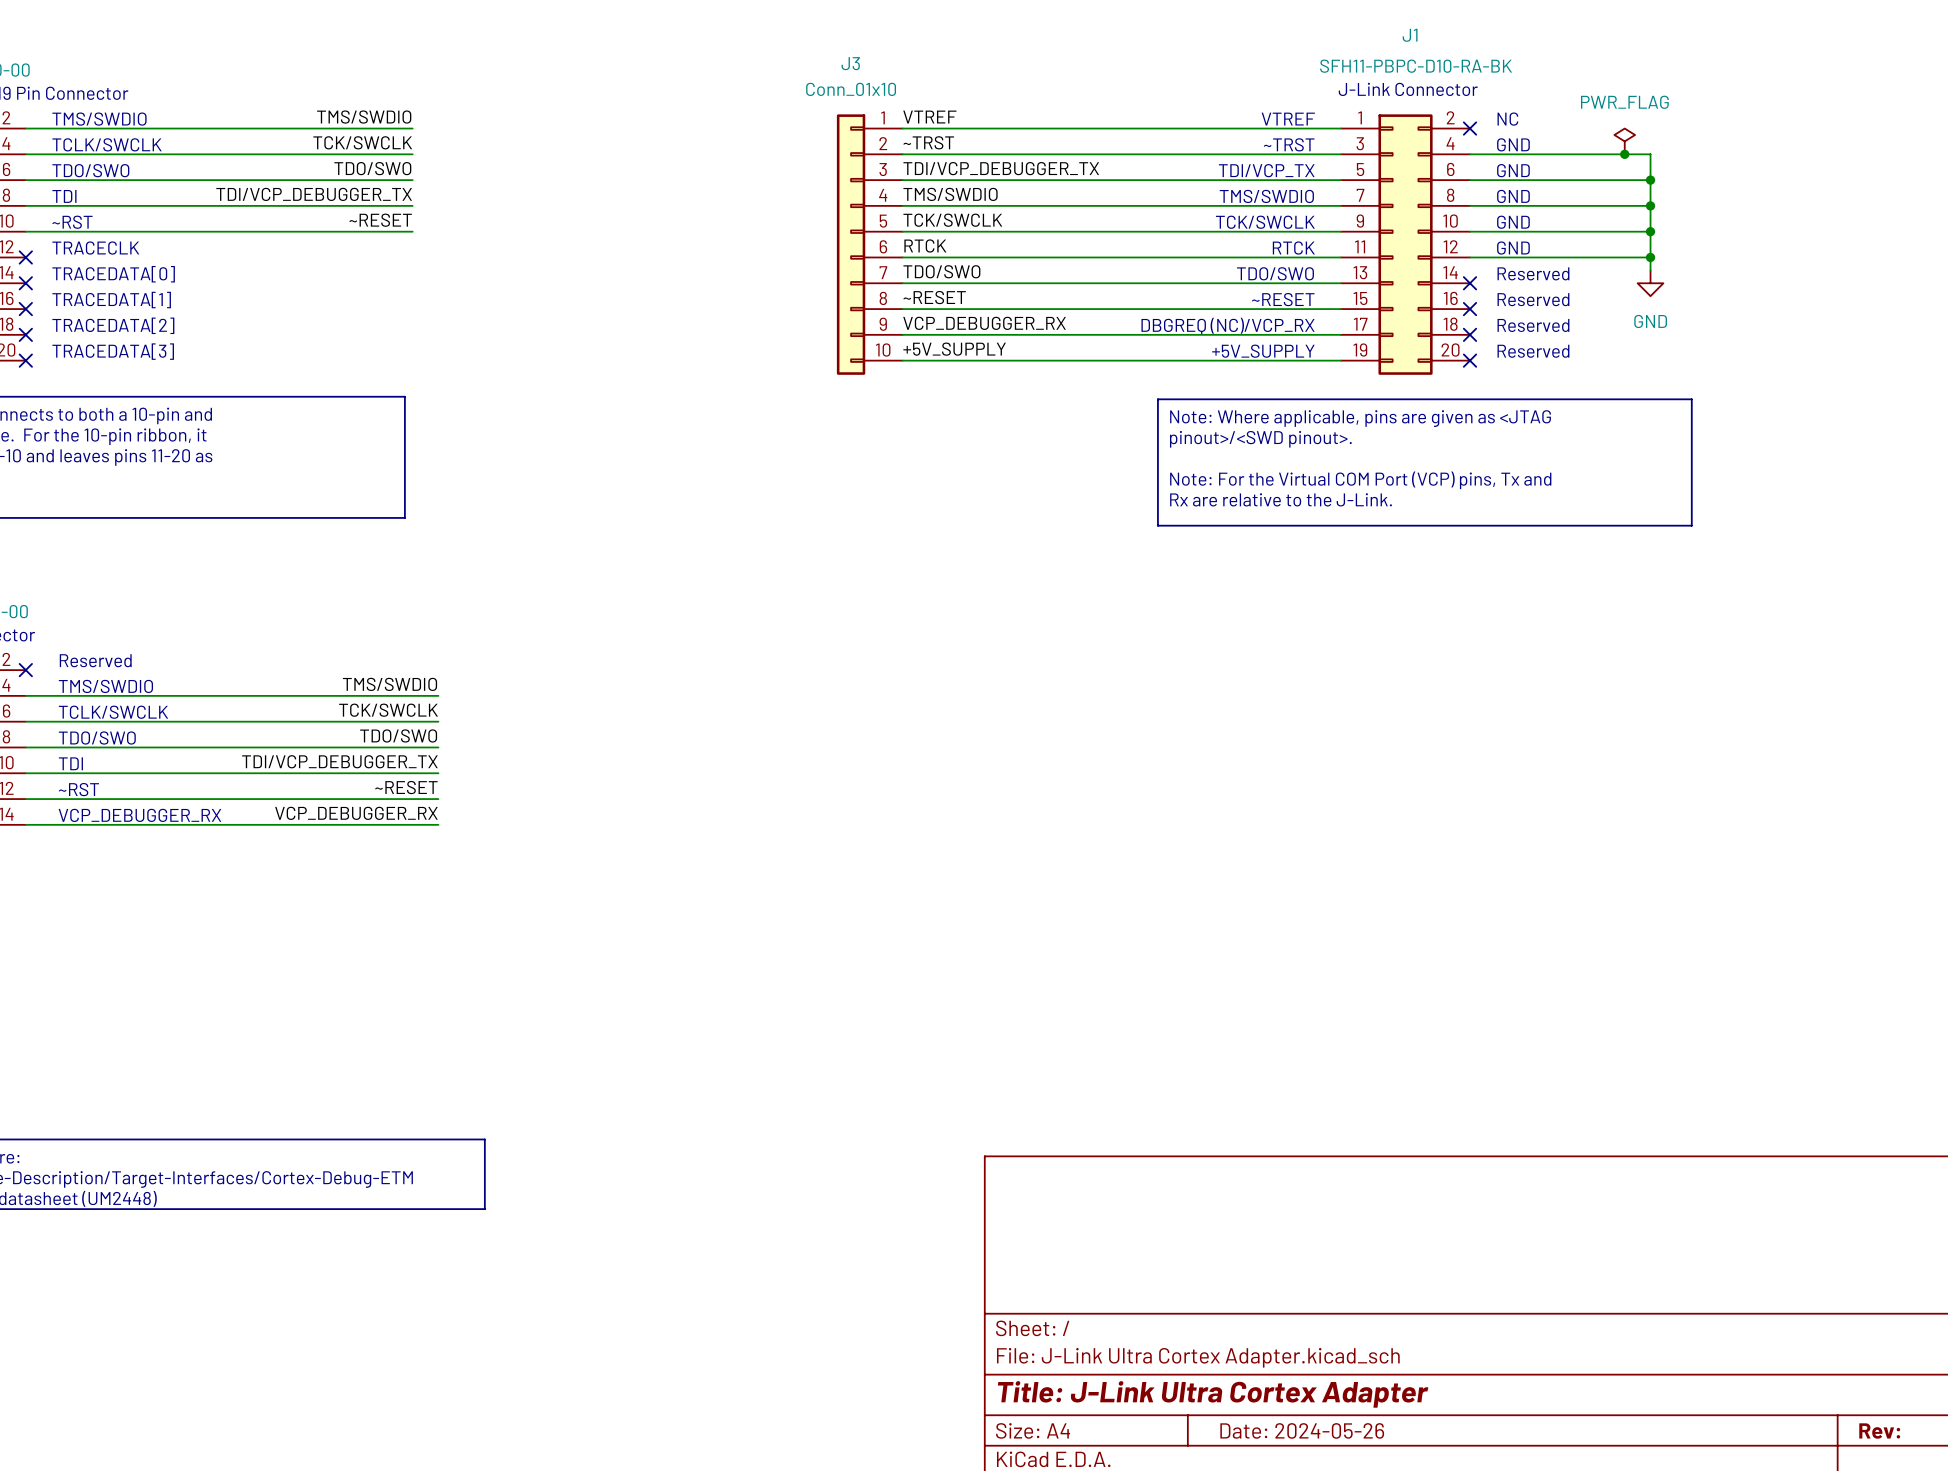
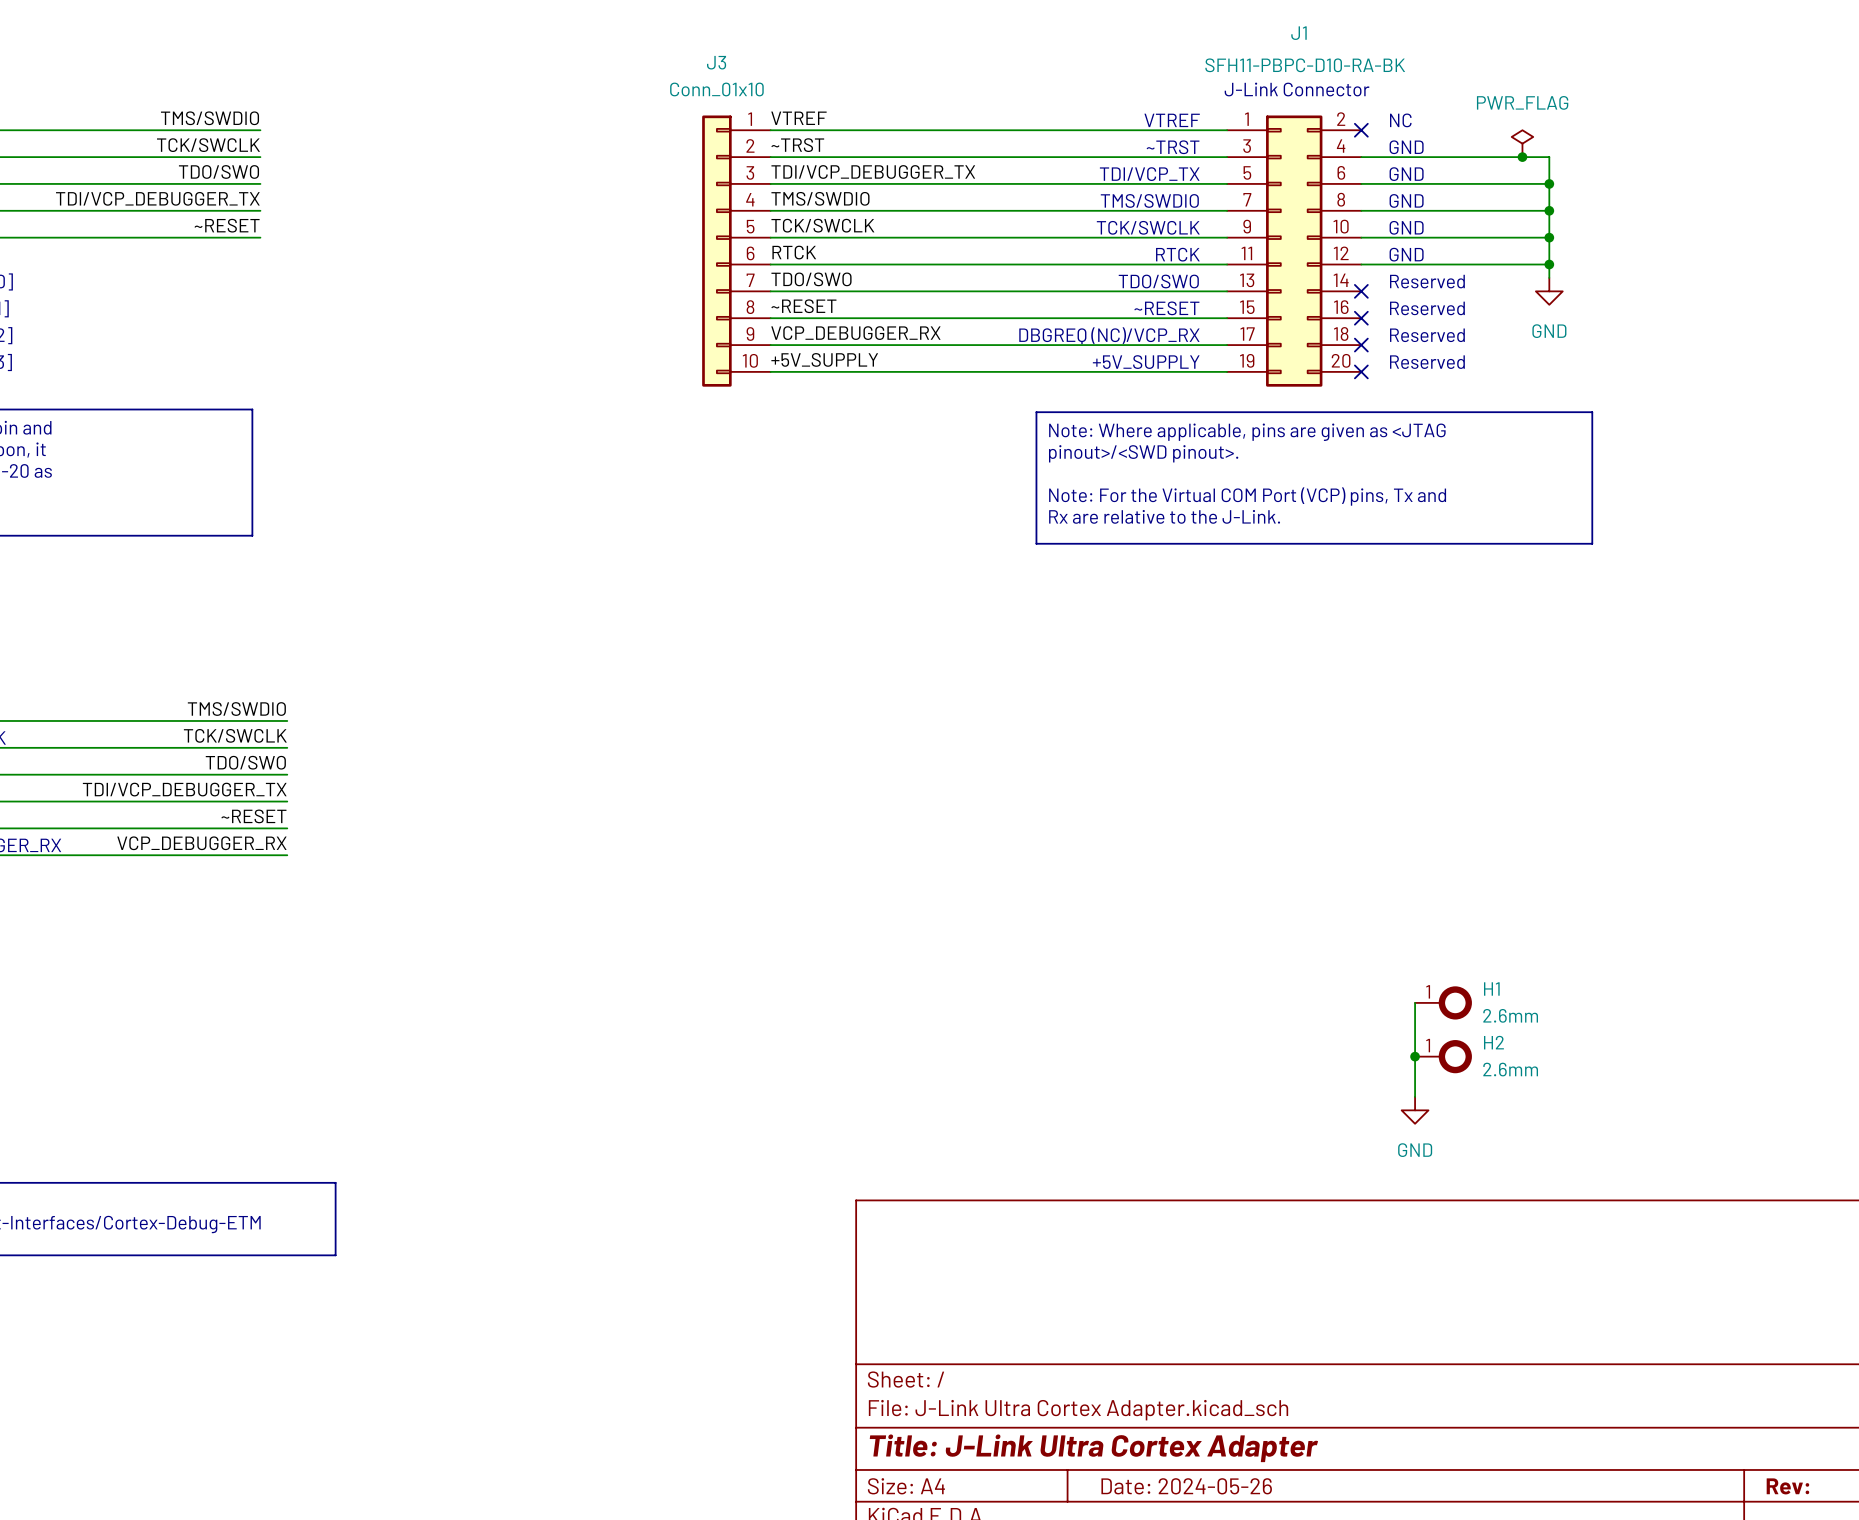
wire: none -> (1415, 1002) (1415, 1096)
H1: none -> 2.6mm (1443, 1002)
junction: none -> (1415, 1056)
H2: none -> 2.6mm (1443, 1056)
power symbol: none -> GND (1415, 1110)

